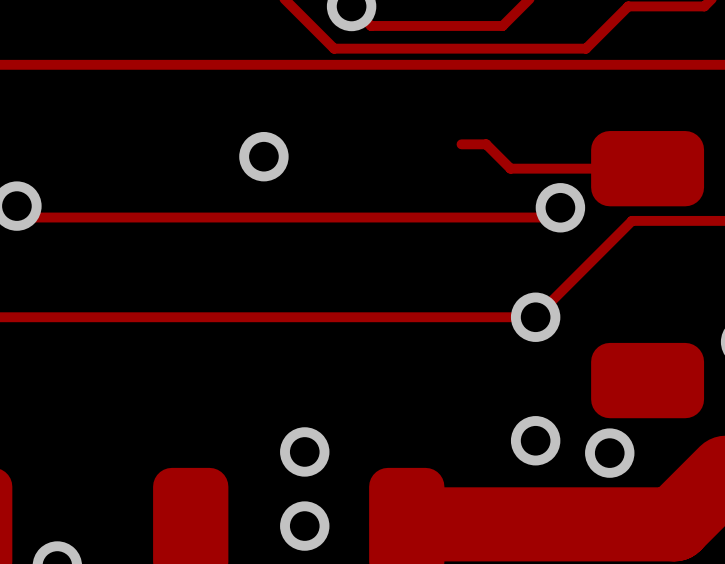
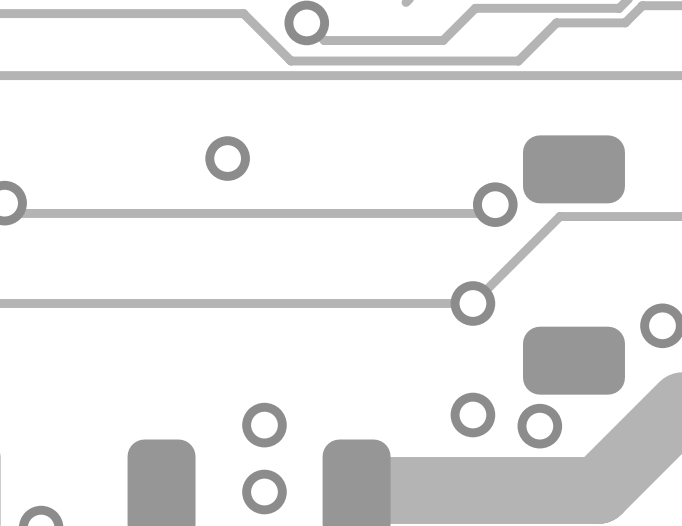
track: (461, 144) (486, 144) (510, 168) (647, 168) -> none

